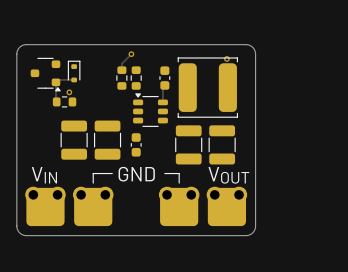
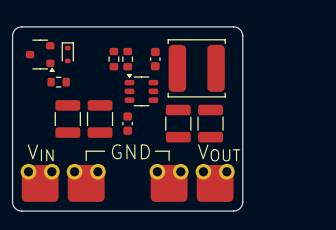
track: (131, 54) (121, 63) (121, 70) -> none
via: (131, 54) -> none
via: (226, 58) -> none
track: (74, 79) (58, 79) (55, 82) (56, 101) -> none
track: (164, 85) (162, 87) (162, 102) -> none
via: (69, 92) -> none

